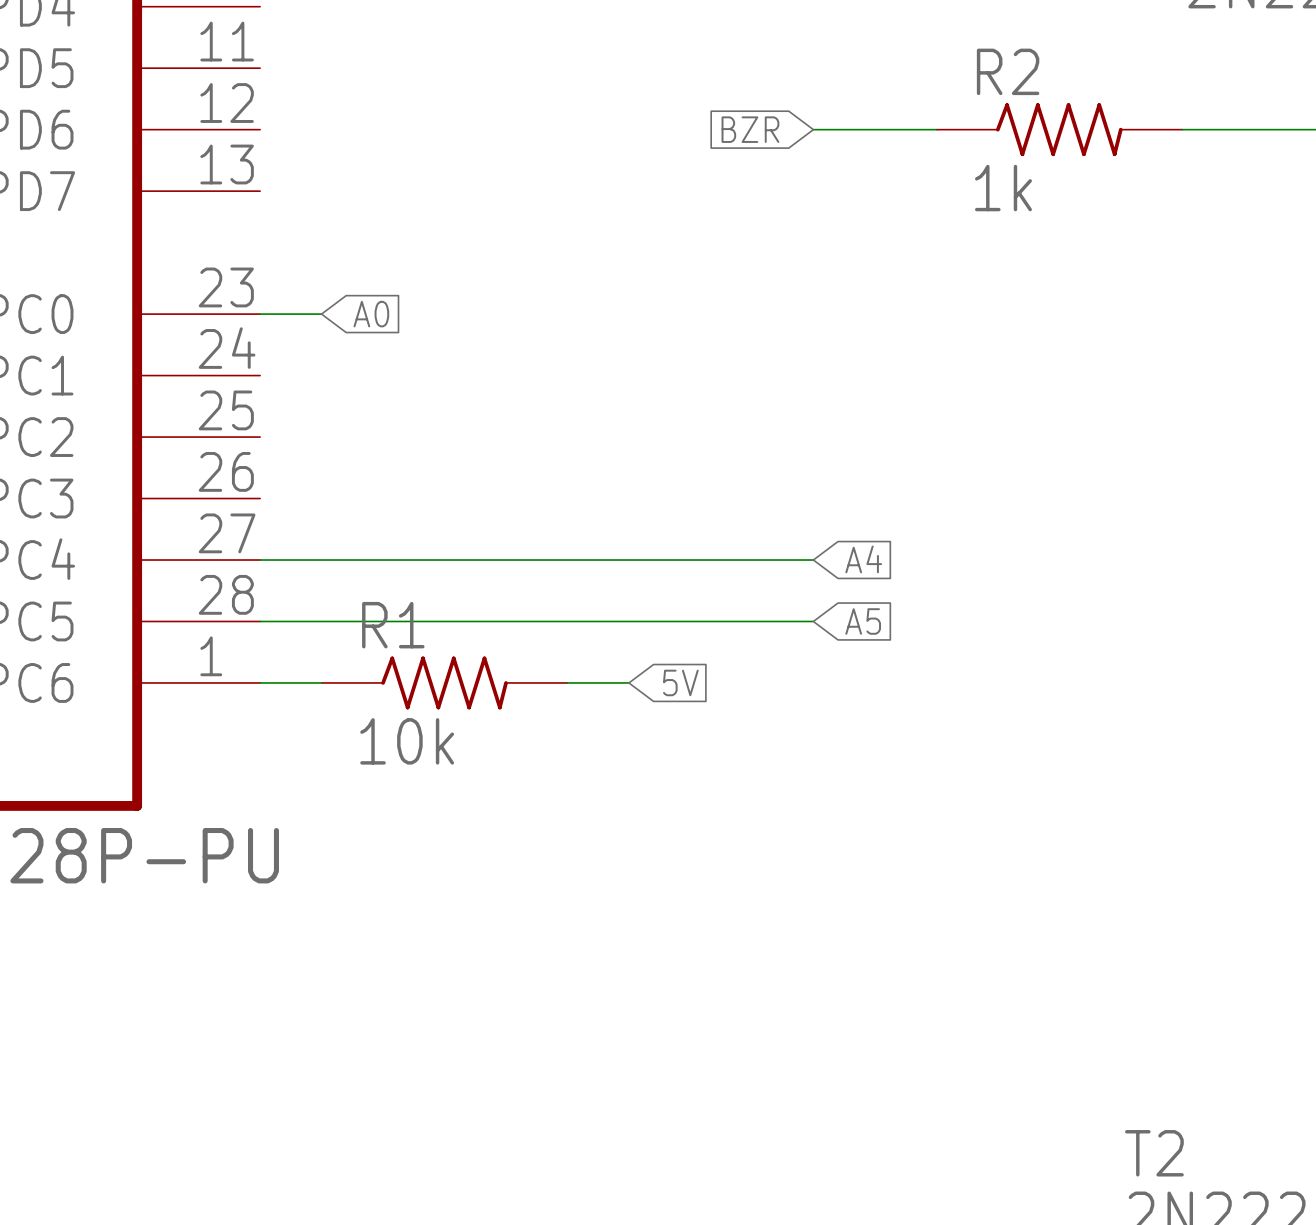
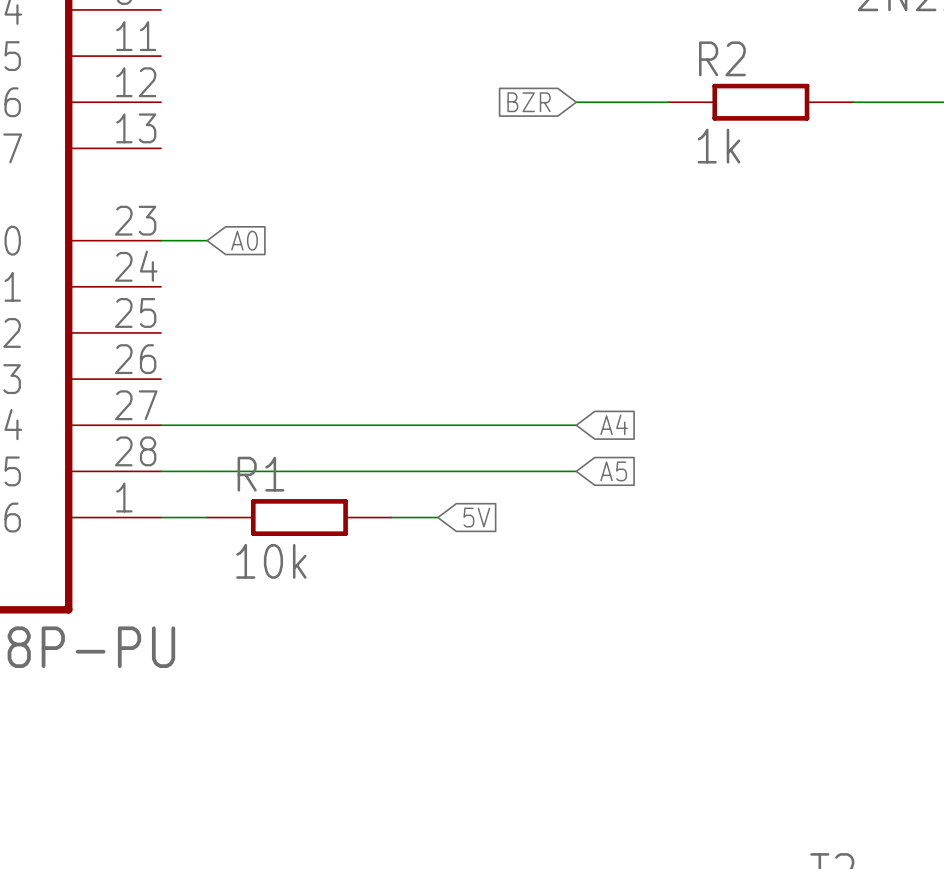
R2 symbol: [936, 103, 1183, 157] -> [668, 83, 854, 121]
R1 symbol: [321, 656, 568, 710] -> [207, 499, 392, 536]

